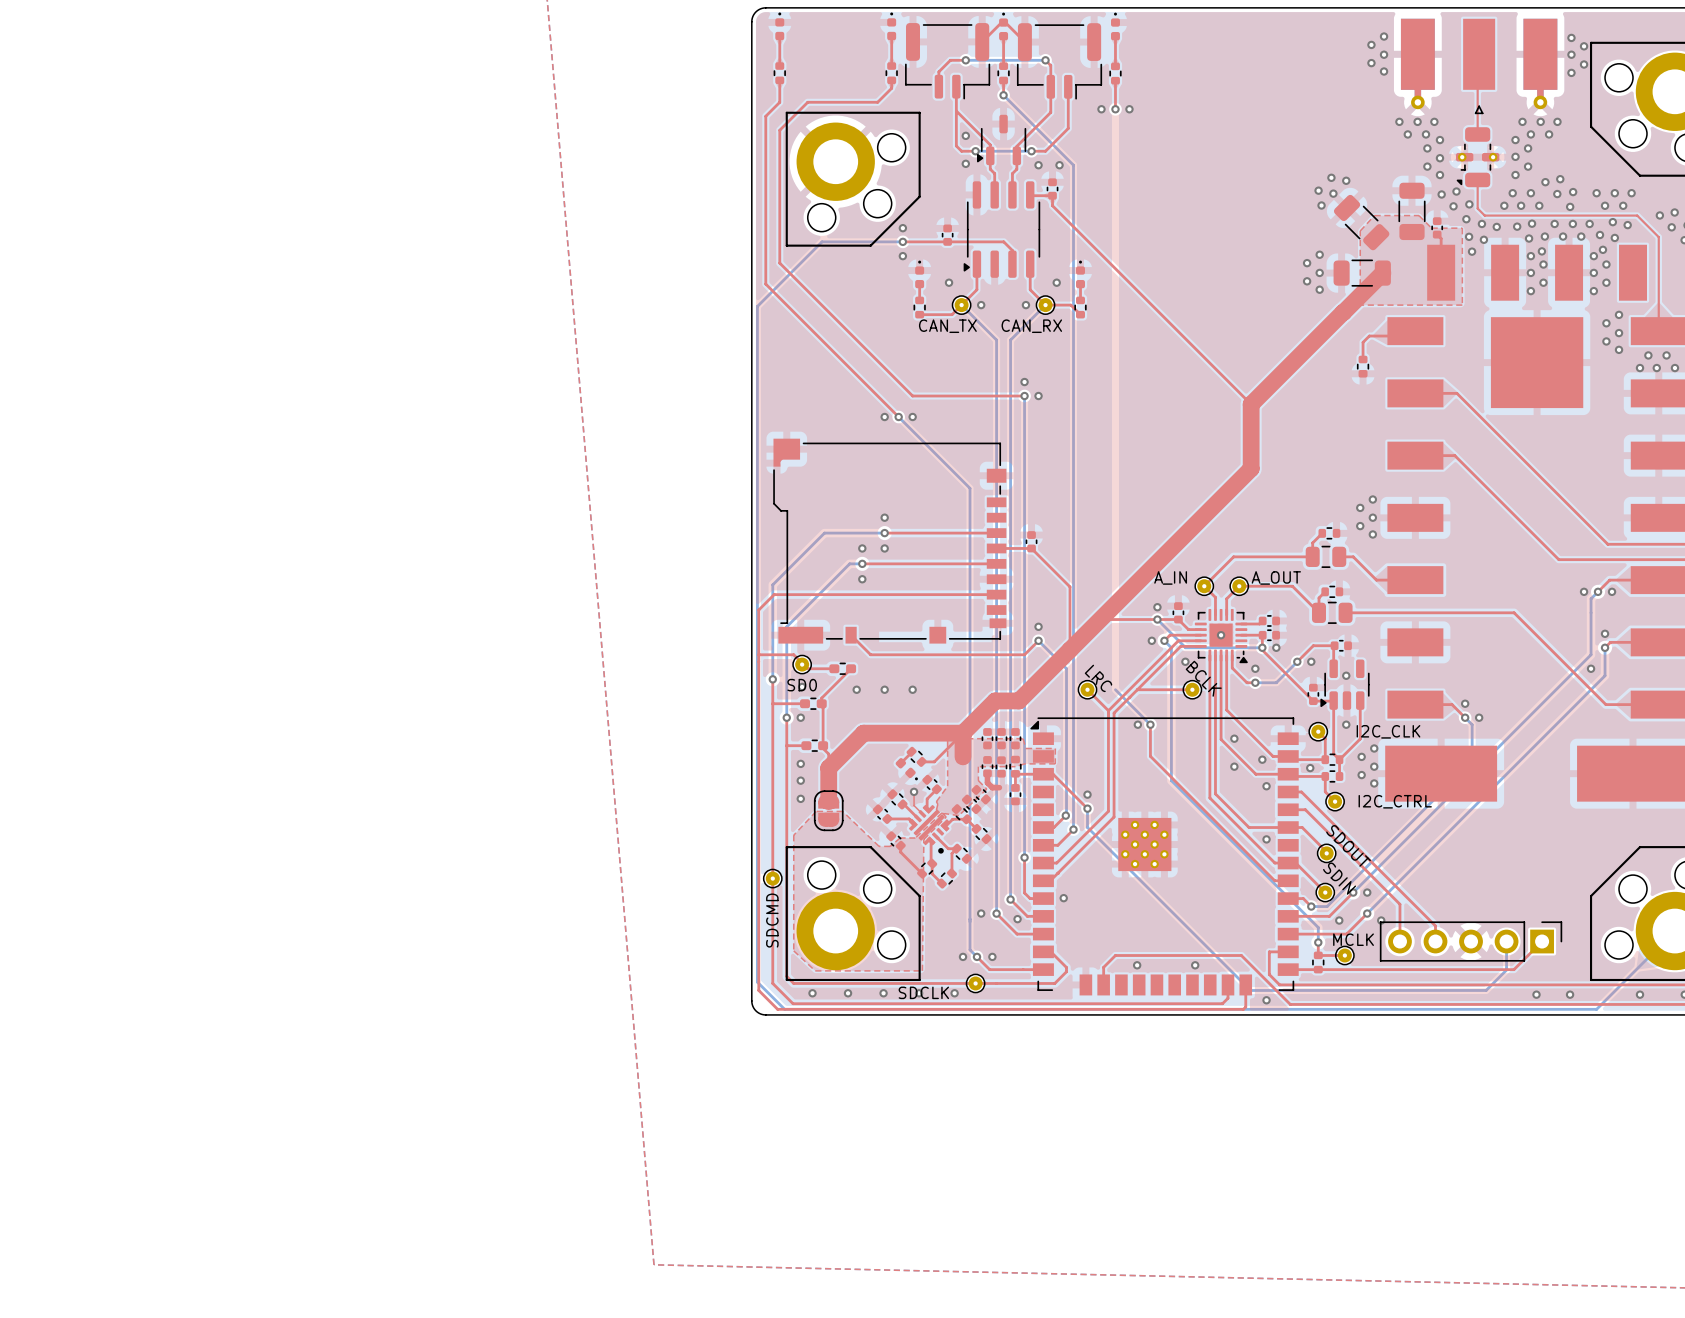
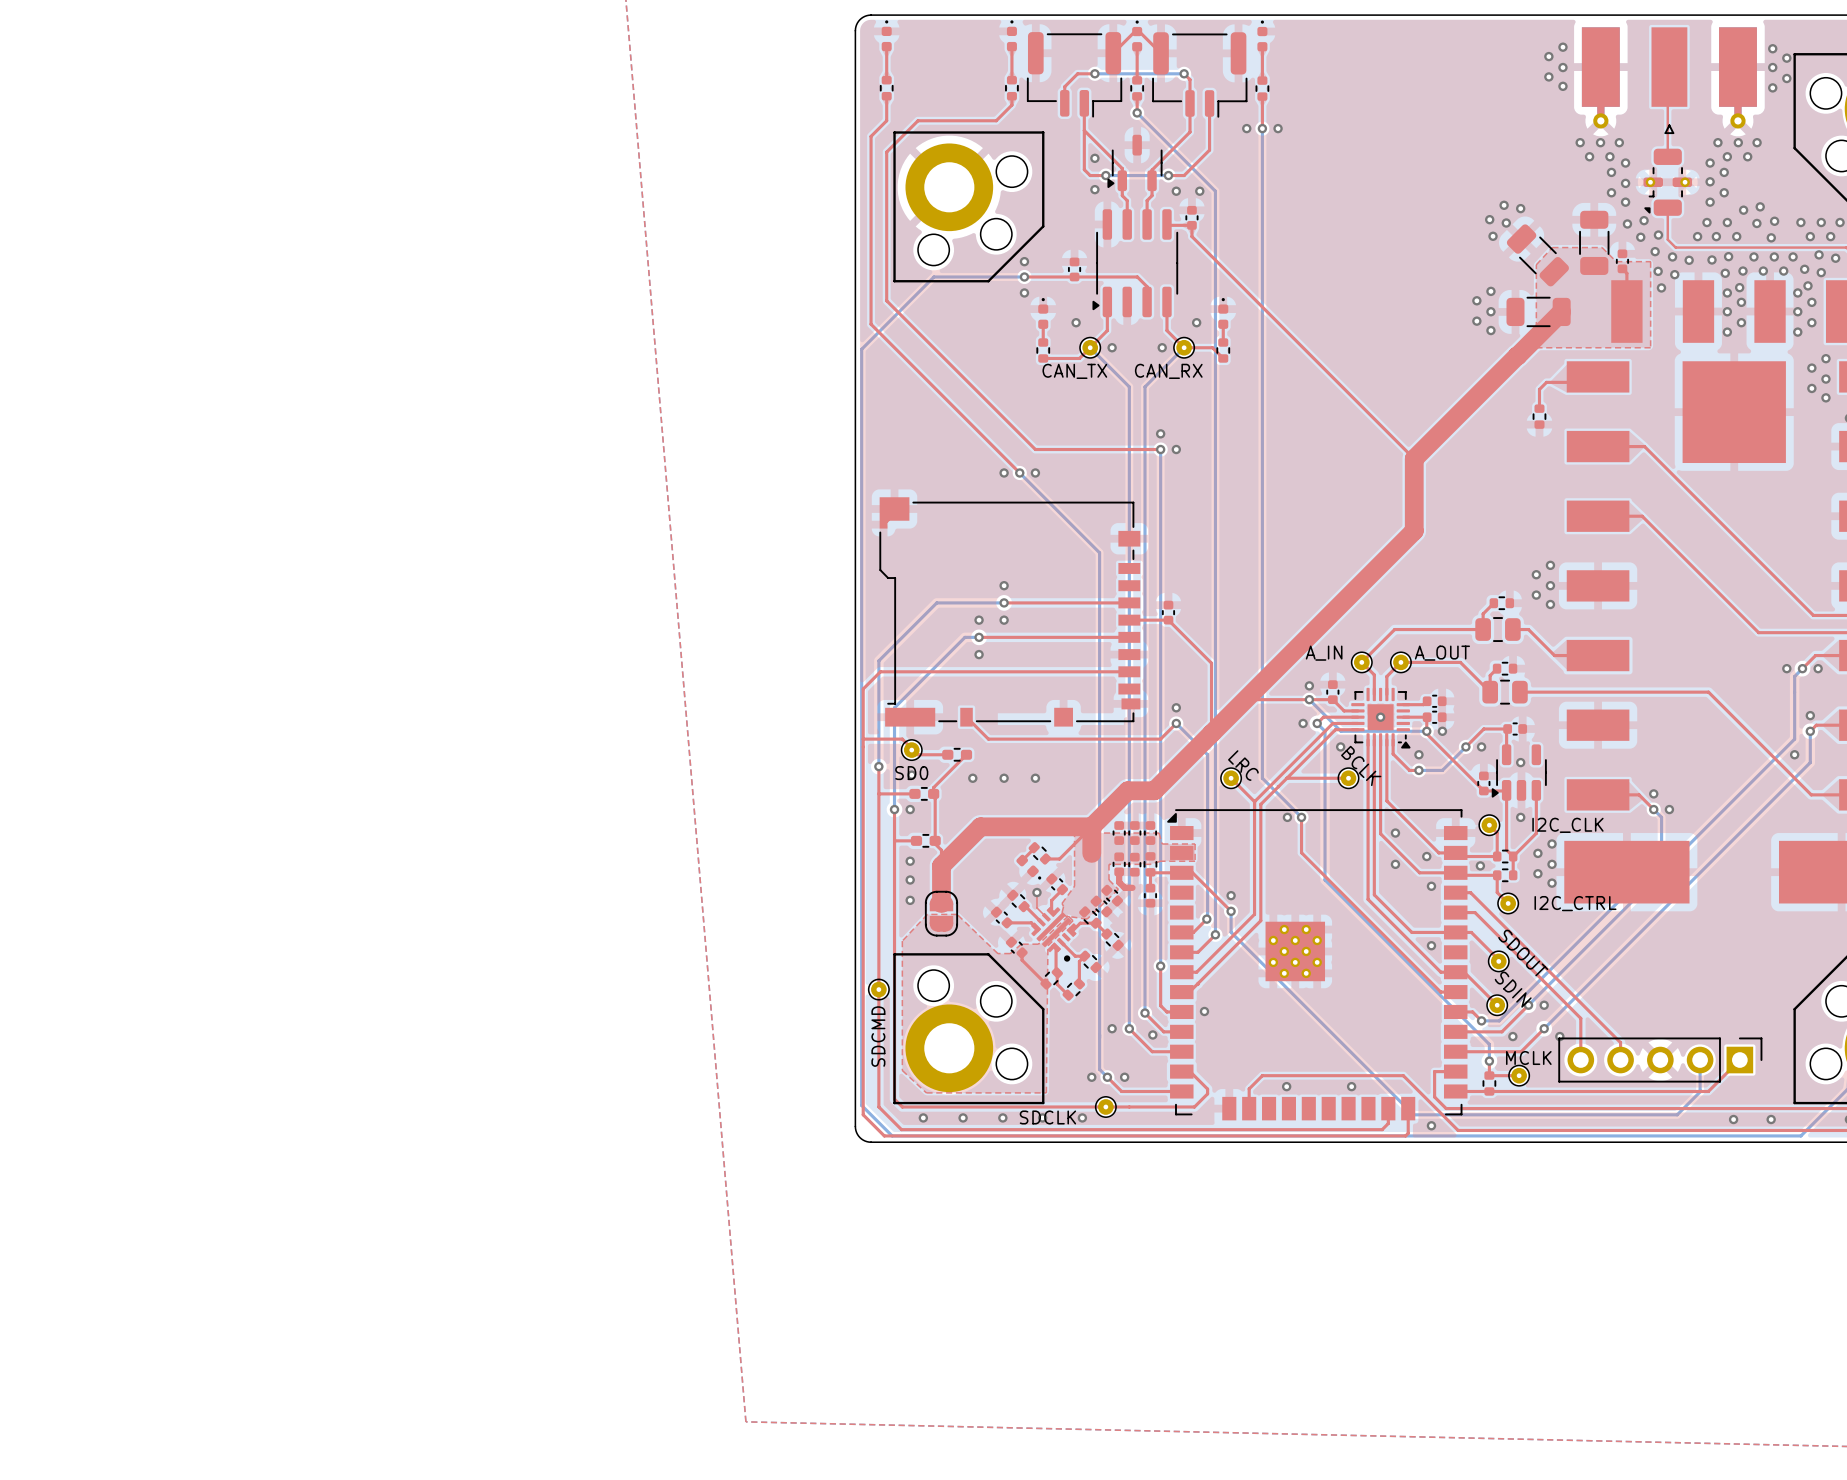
bottom track: none -> (1262, 128) (1262, 778)

